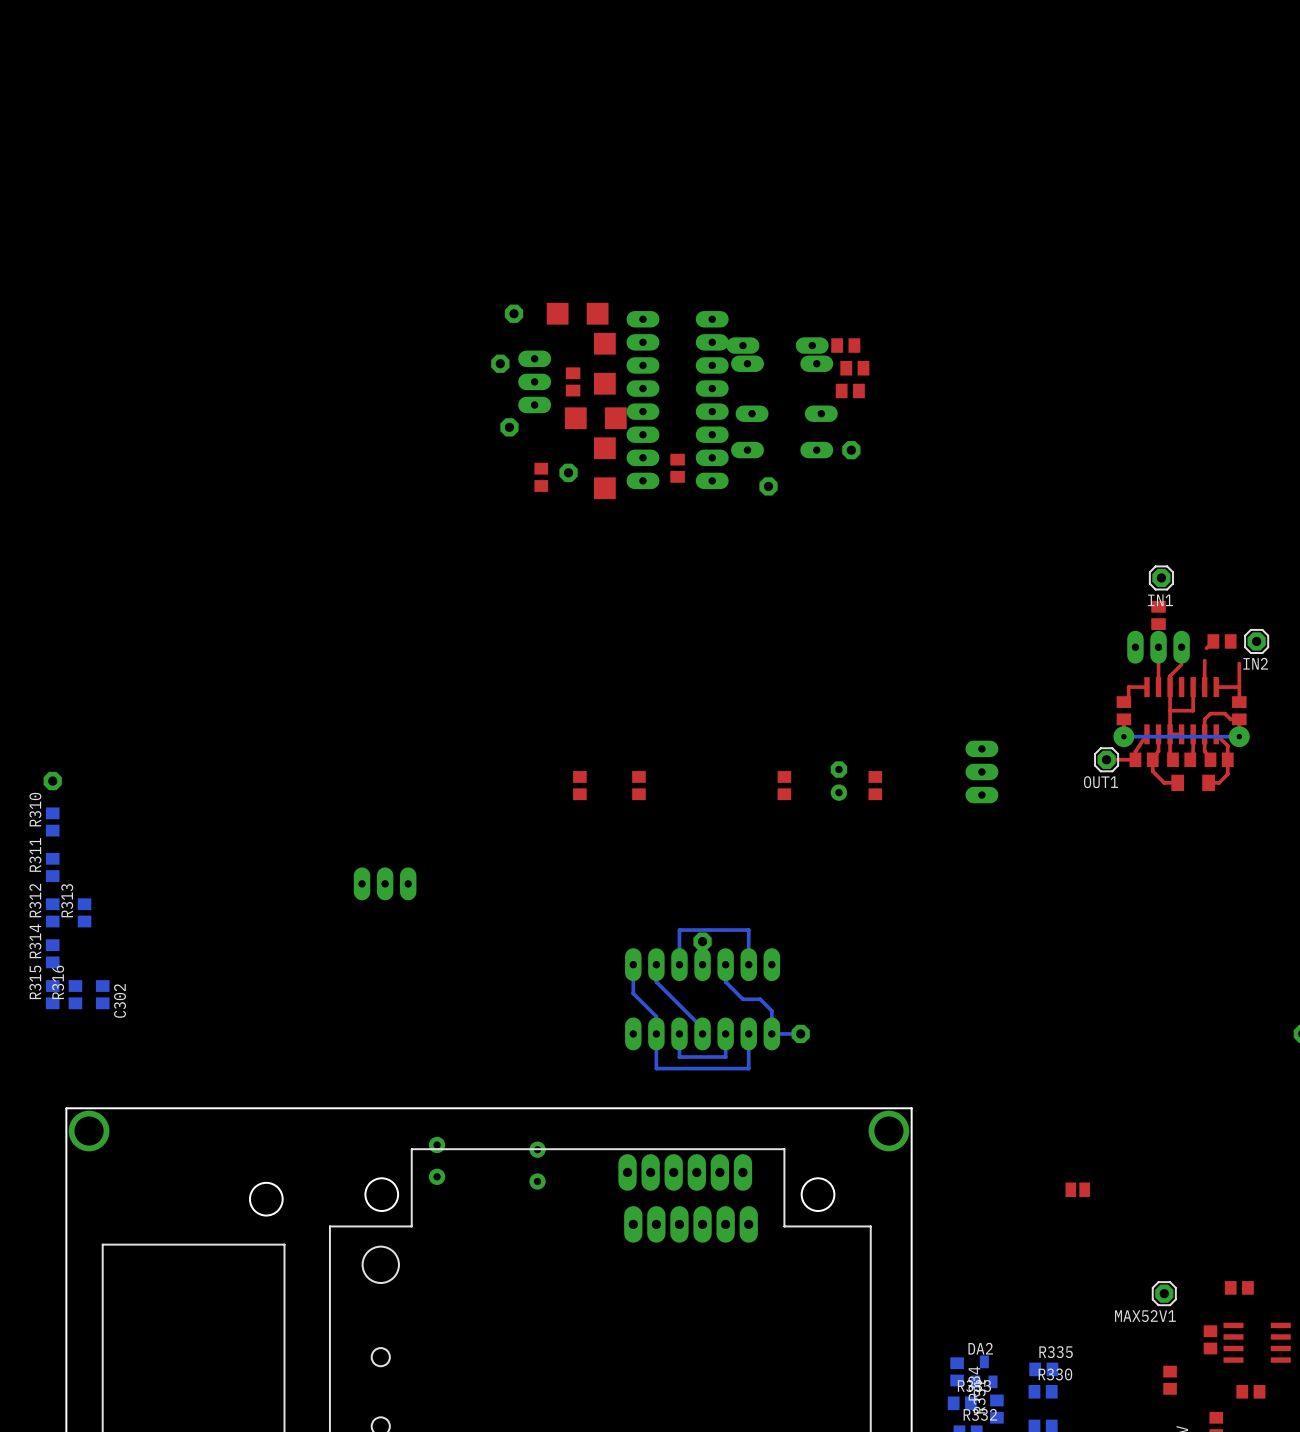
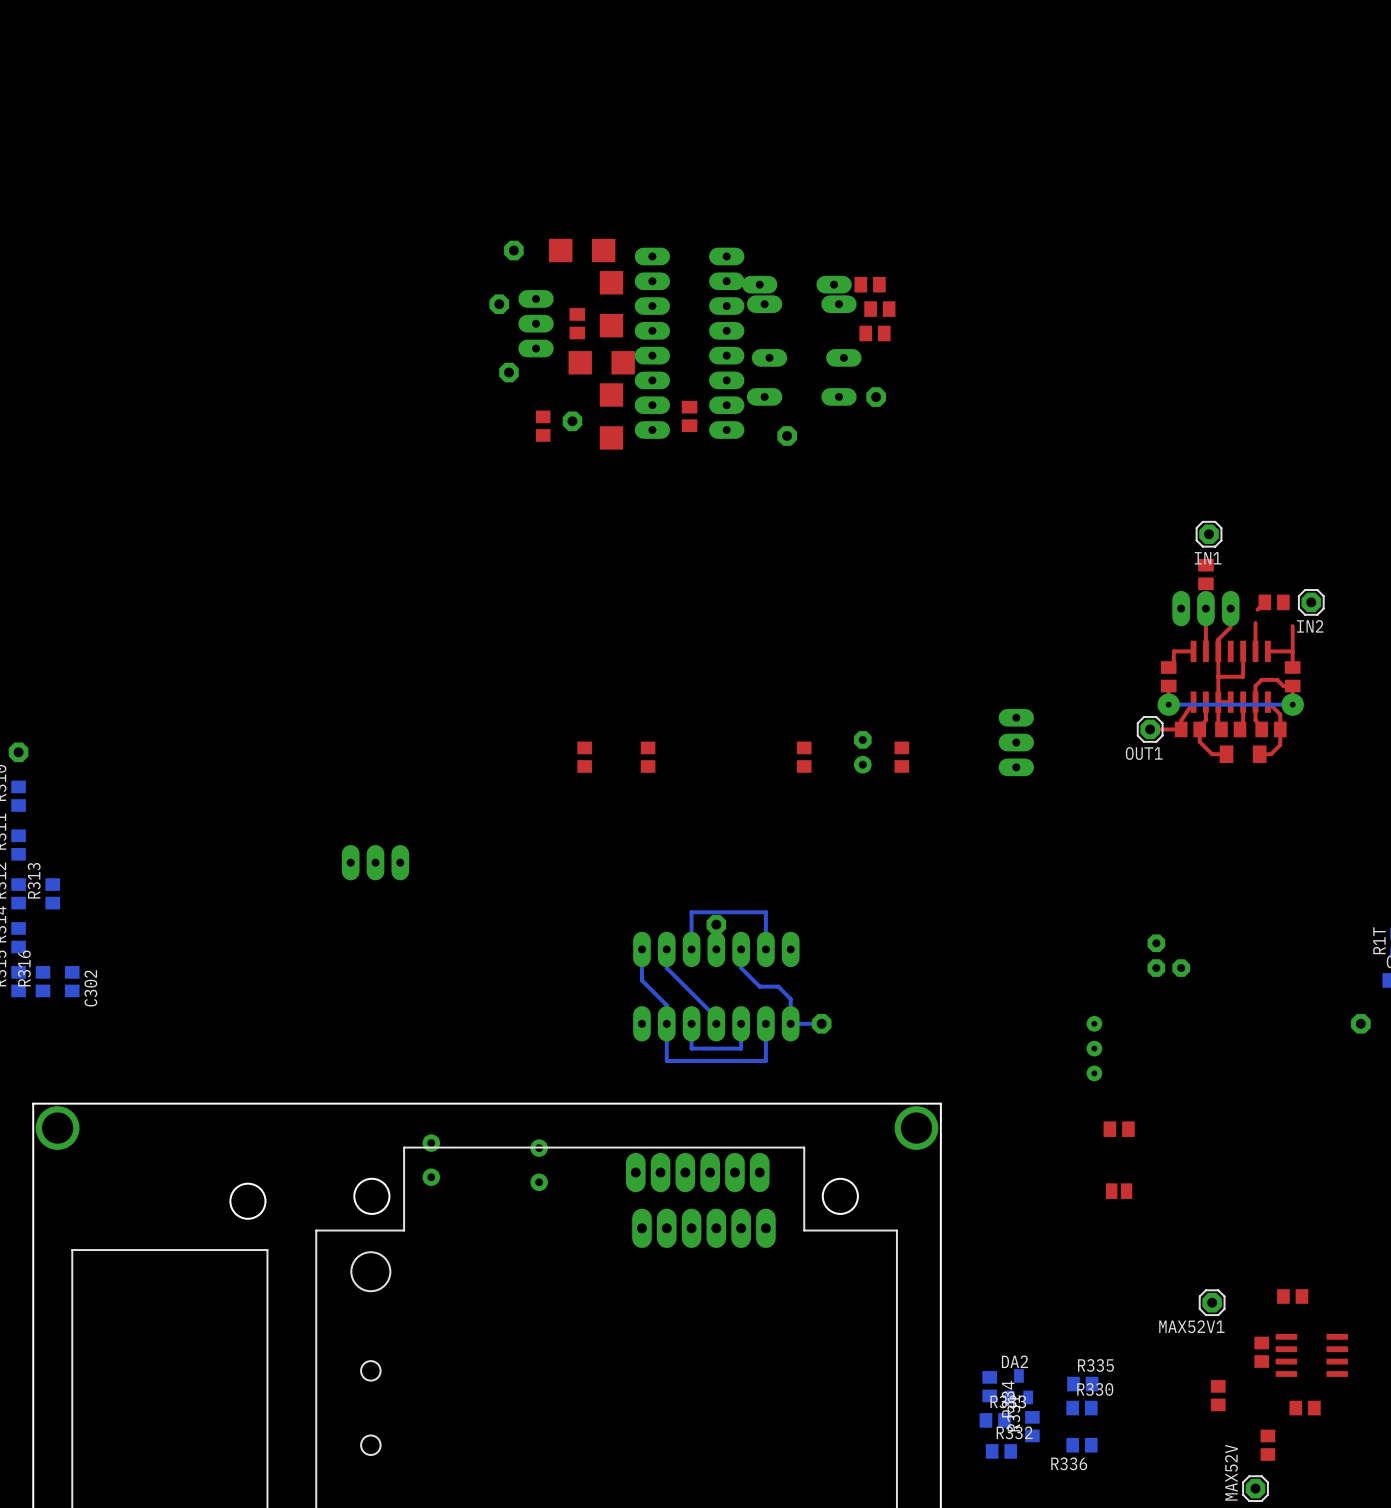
part: none -> (1168, 955)
part: none -> (1094, 1048)
part: none -> (1119, 1129)

